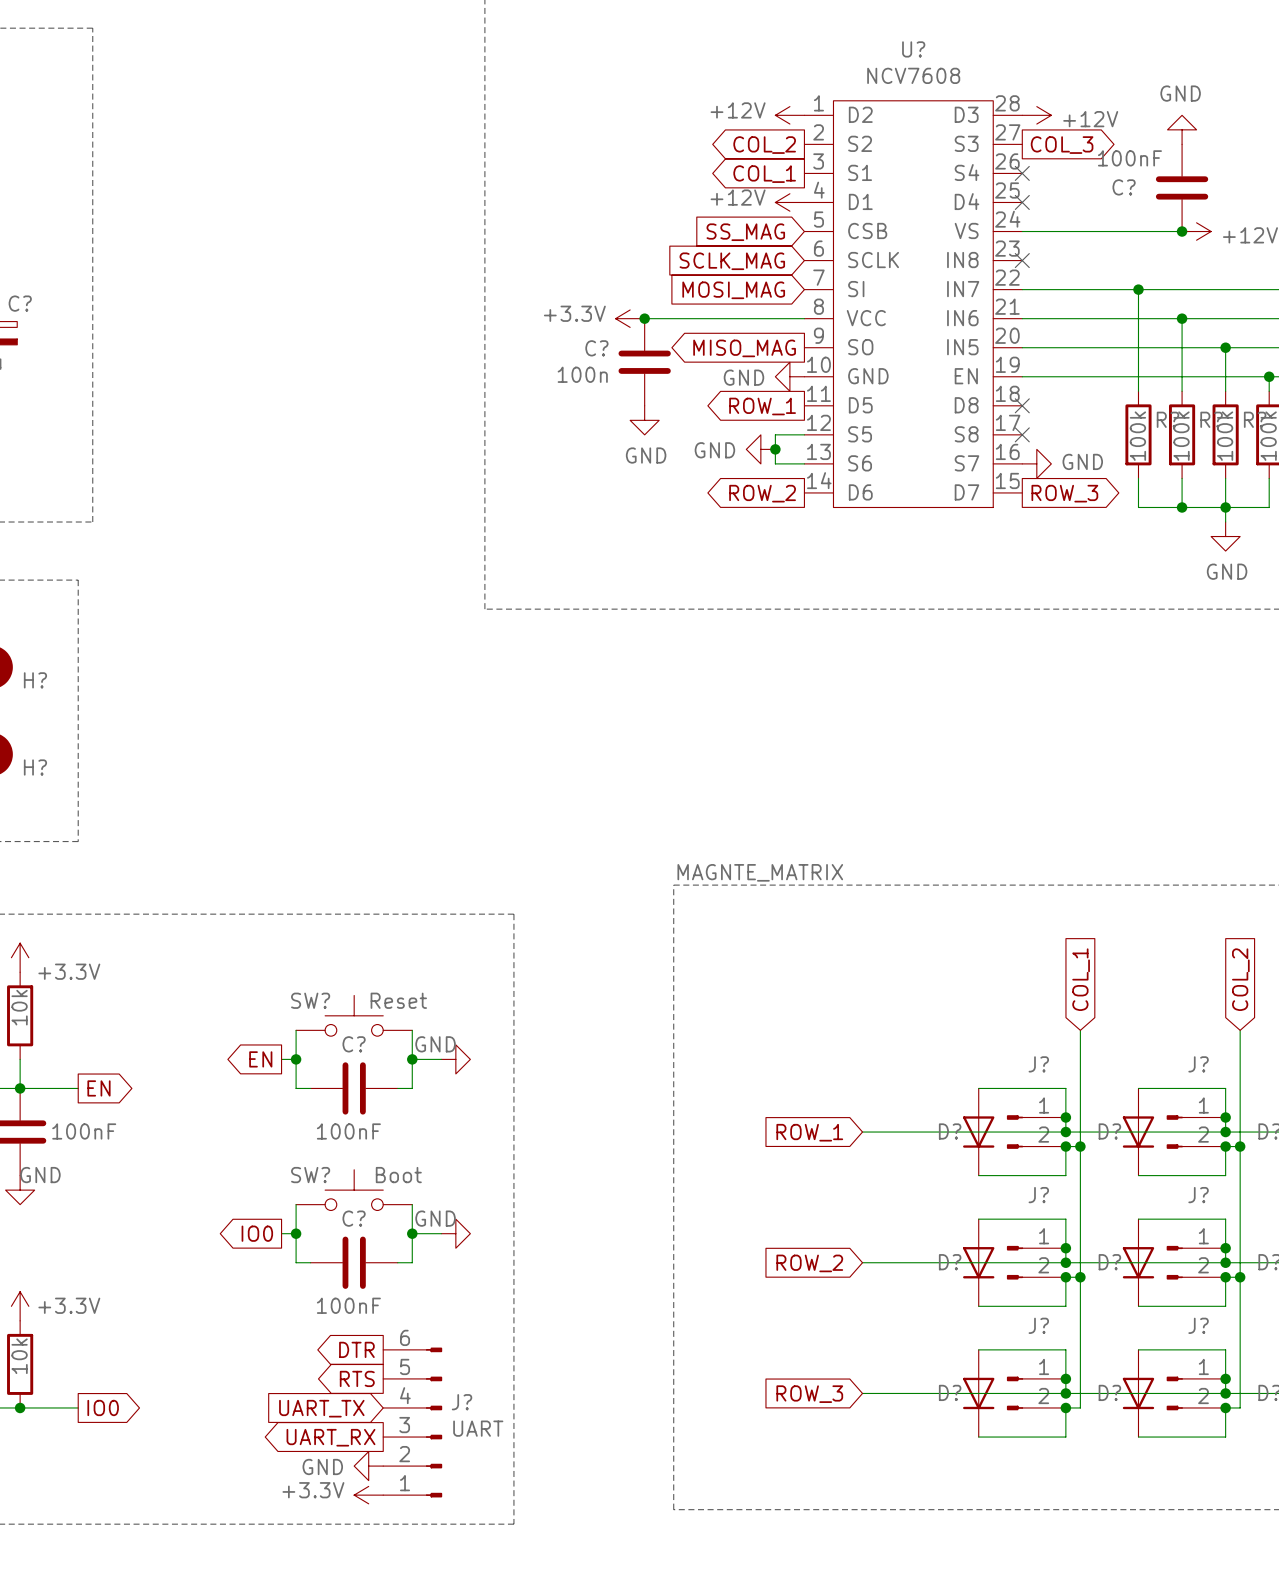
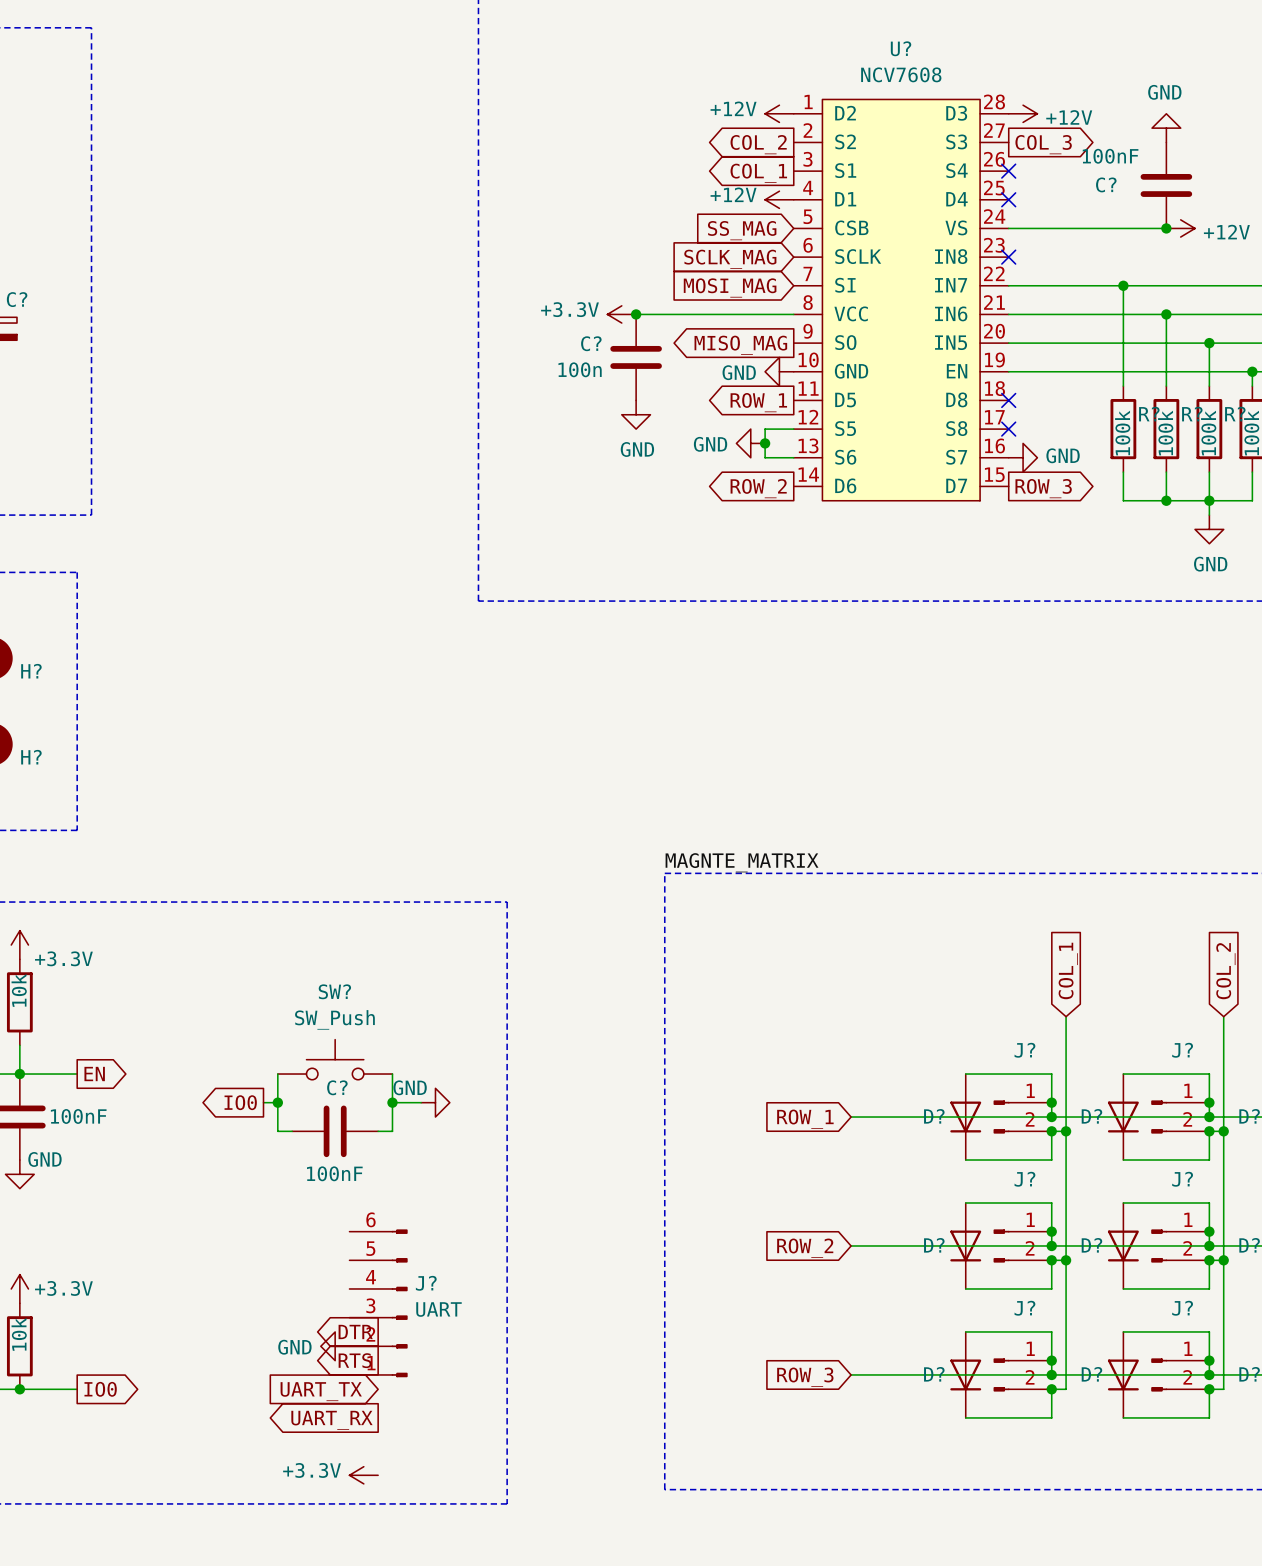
SW?: Reset (354, 1015) -> none
wire: (296, 1030) (296, 1088) (310, 1088) -> (277, 1074) (277, 1131) (292, 1131)
wire: (412, 1030) (412, 1088) (397, 1088) -> (378, 1131) (392, 1131) (392, 1074)
global label: EN (260, 1059) -> none
wire: (281, 1059) (296, 1059) -> (263, 1102) (277, 1102)
junction: (296, 1059) -> none
wire: (412, 1059) (441, 1059) -> (392, 1102) (421, 1102)
junction: (412, 1059) -> none
power symbol: GND (455, 1059) -> none
SW?: none -> SW_Push (335, 1059)
C?: 100nF (354, 1088) -> none
junction: none -> (277, 1102)
junction: none -> (392, 1102)
power symbol: none -> GND (435, 1102)
C?: none -> 100nF (335, 1131)
SW?: Boot (354, 1190) -> none
wire: (296, 1204) (296, 1262) (310, 1262) -> none
wire: (412, 1204) (412, 1262) (397, 1262) -> none
global label position: IO0 (257, 1233) -> IO0 (240, 1102)
wire: (281, 1233) (296, 1233) -> none
junction: (296, 1233) -> none
wire: (412, 1233) (441, 1233) -> none
junction: (412, 1233) -> none
power symbol: GND (455, 1233) -> none
C?: 100nF (354, 1262) -> none
power symbol: none -> GND (335, 1346)
J? position: (412, 1422) -> (378, 1303)
power symbol: GND (368, 1466) -> none

